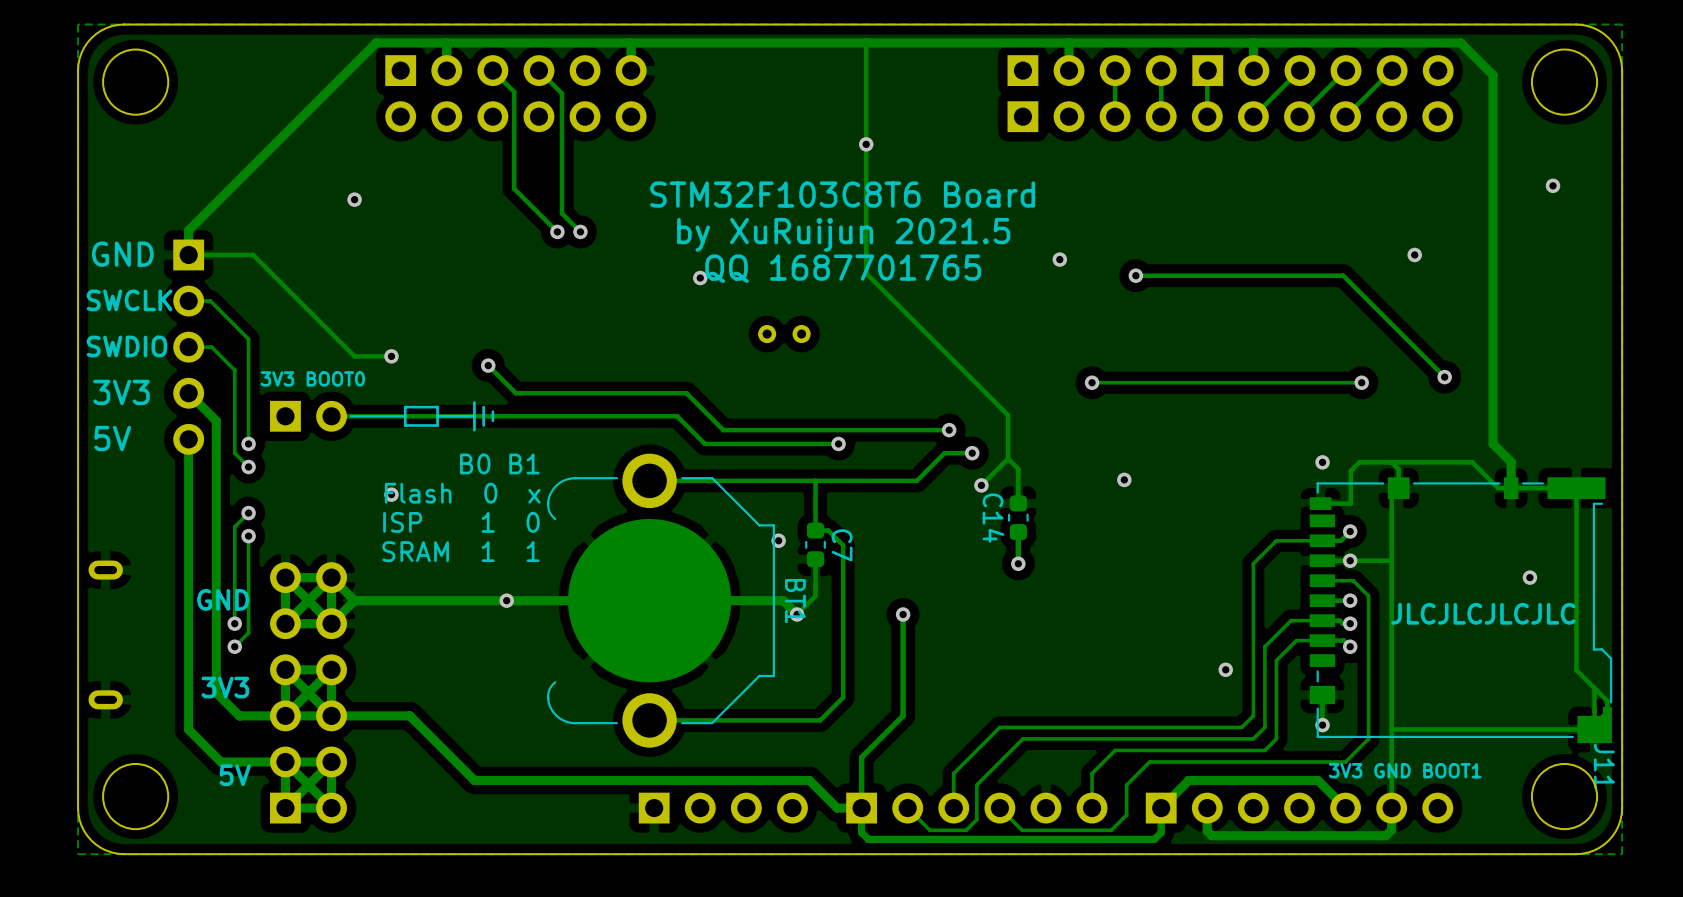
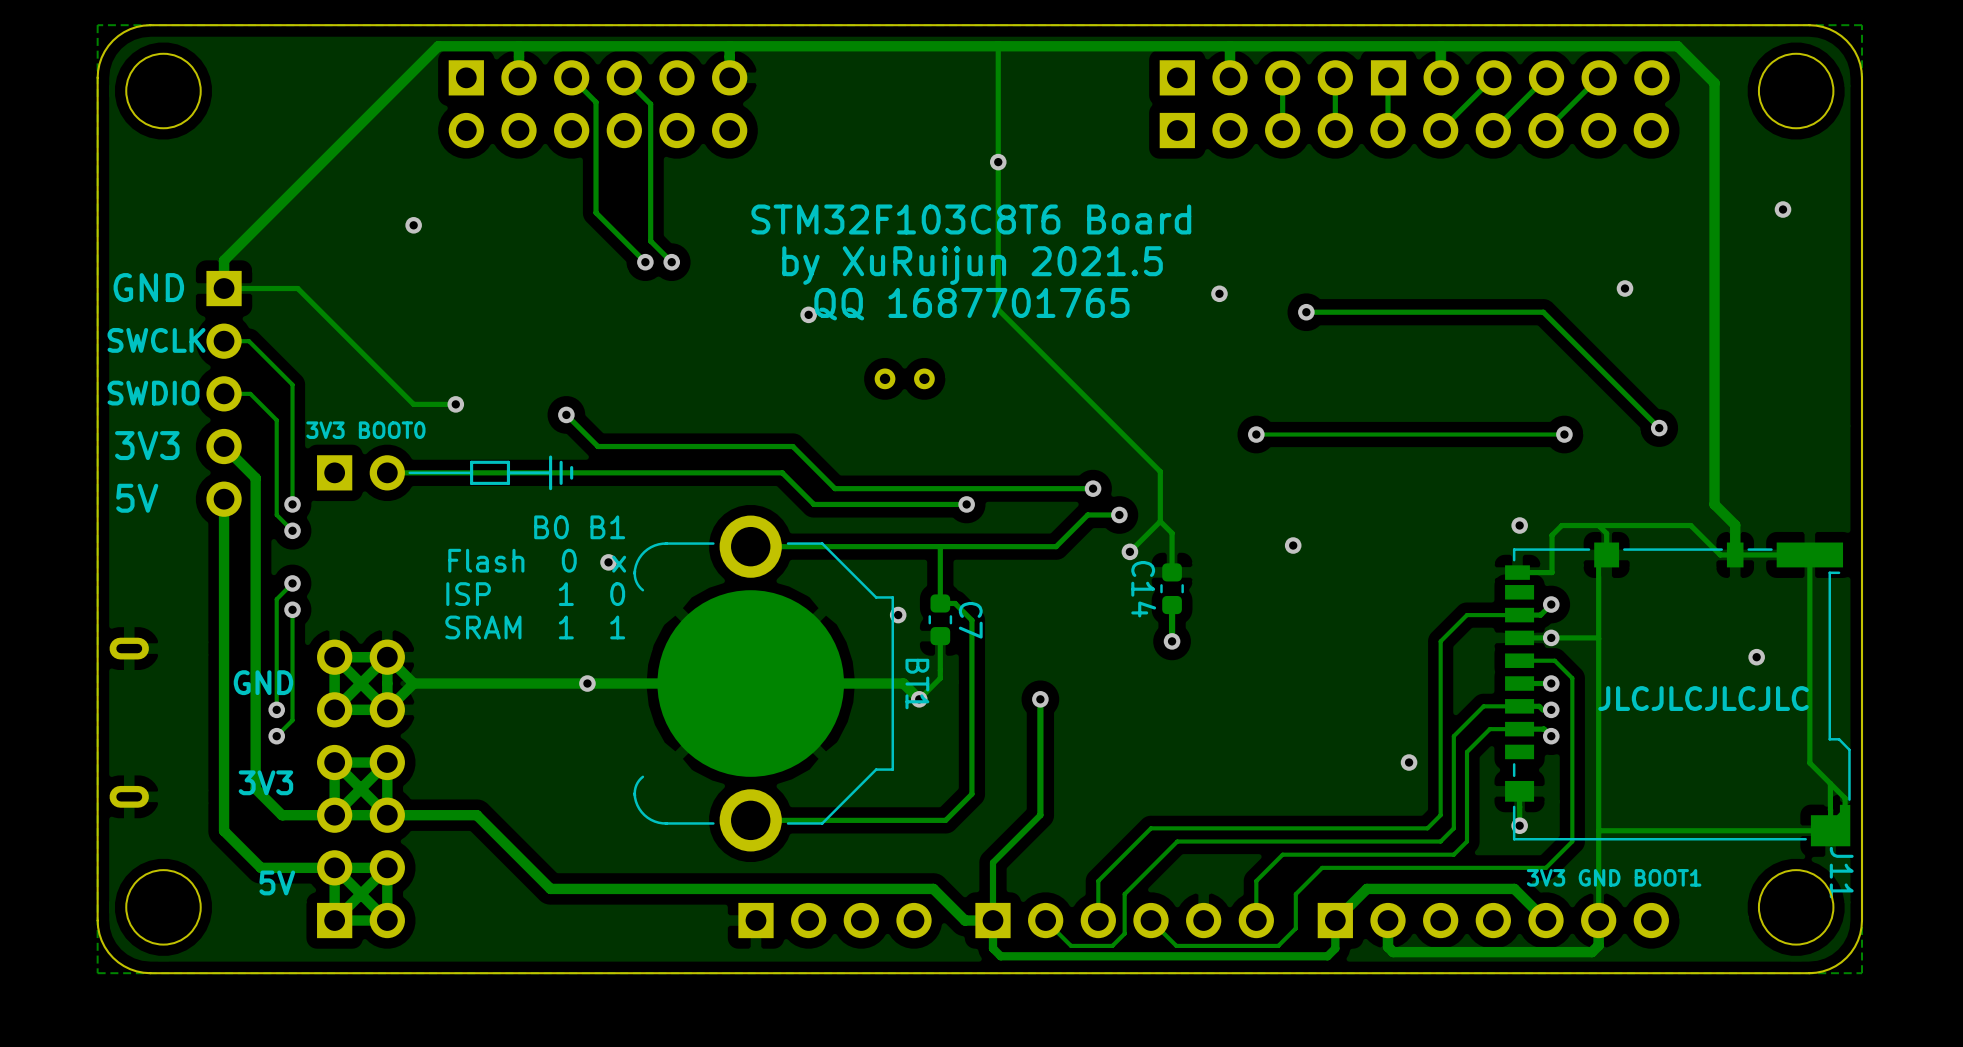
via: (391, 494) -> none
via: none -> (608, 562)

